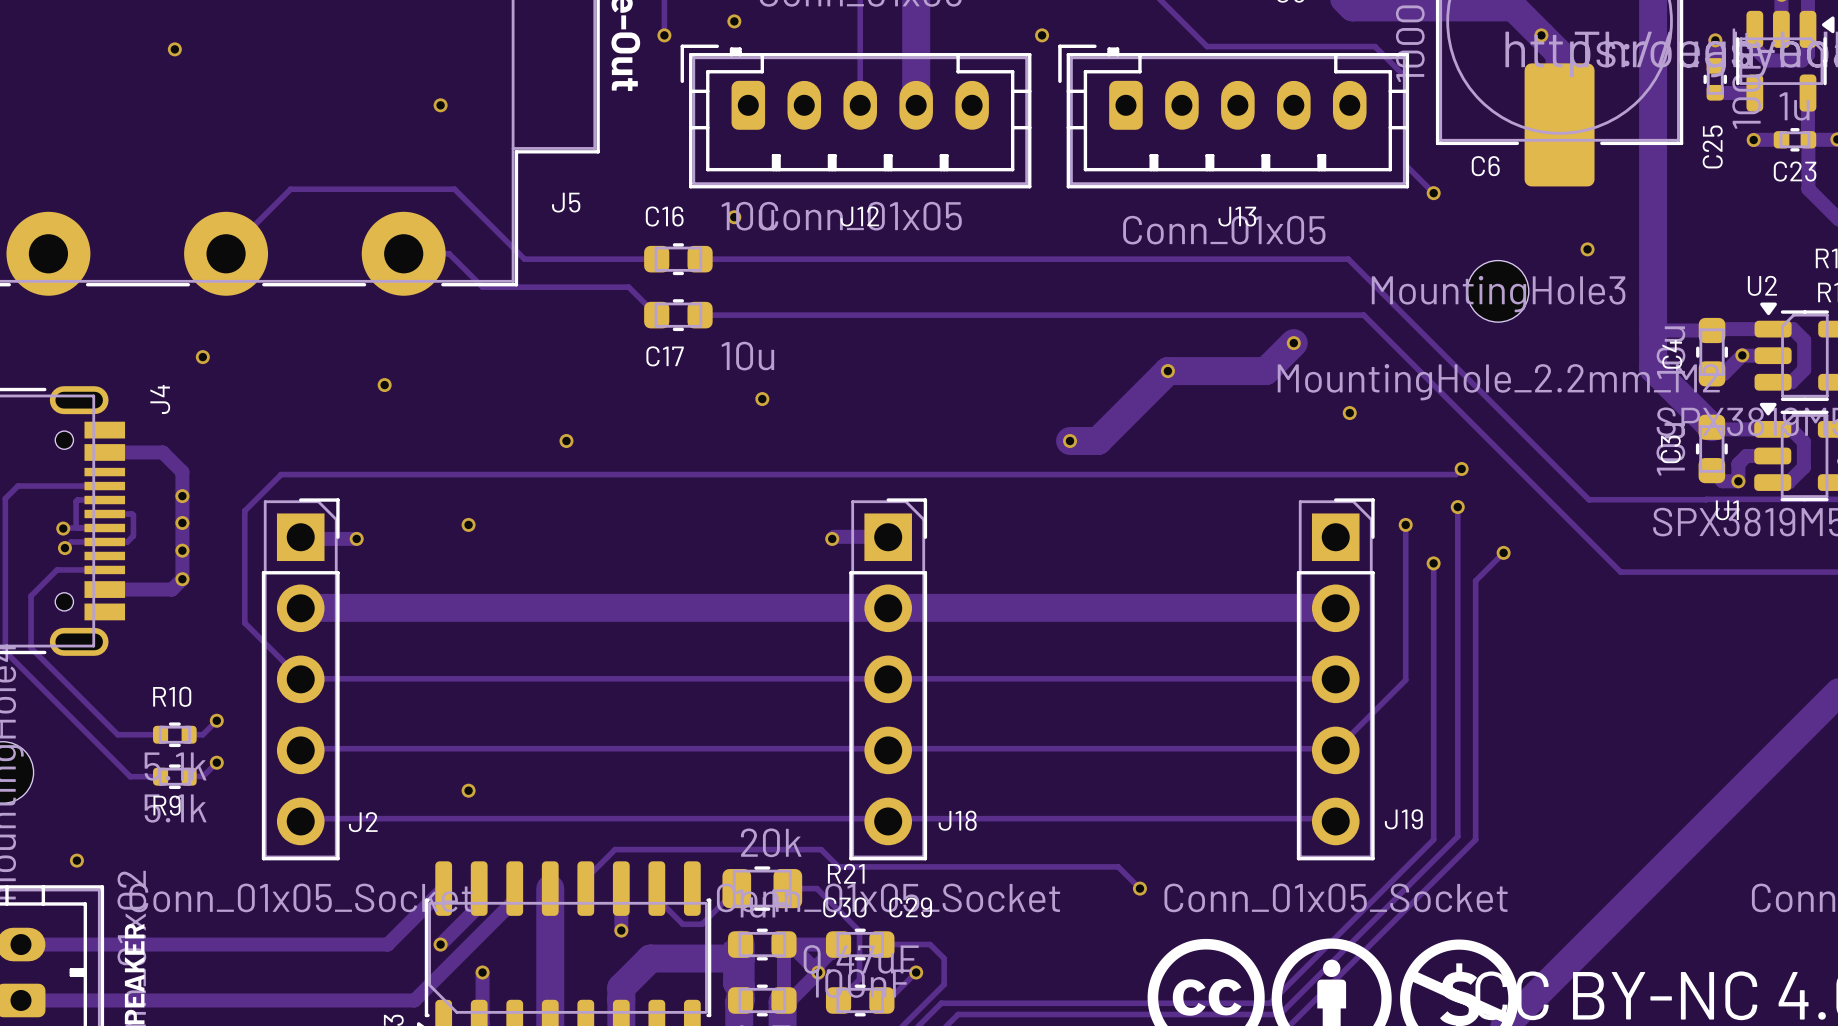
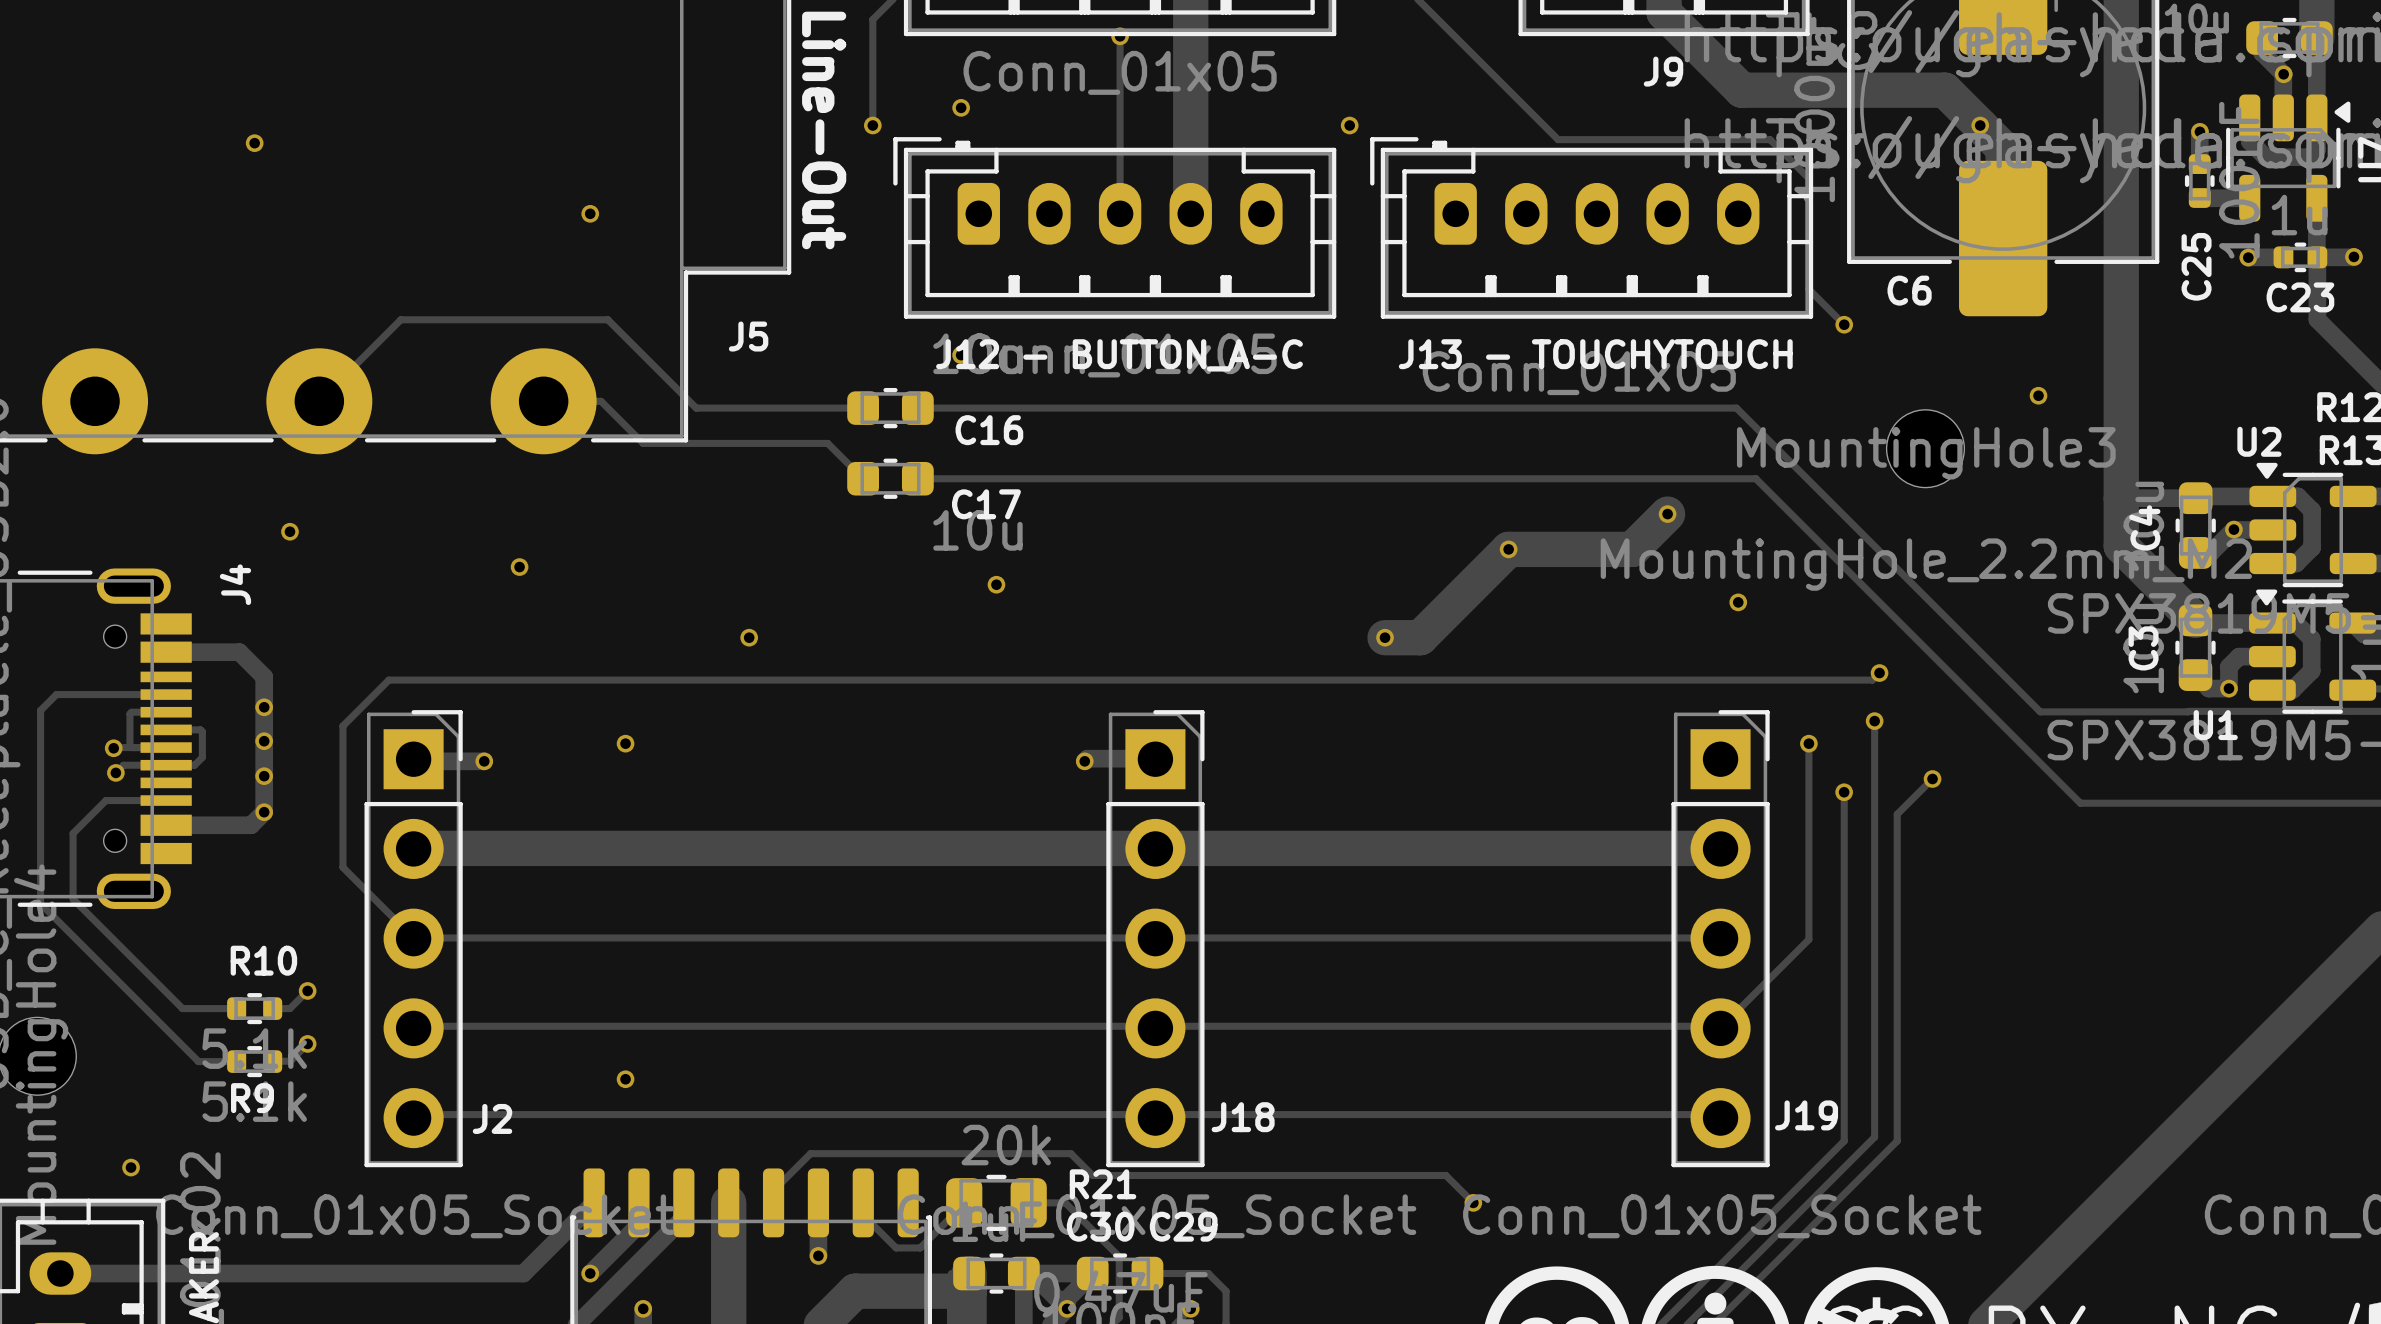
C16 name position: C16 (664, 216) -> C16 (989, 430)
J12 name: J12 (859, 216) -> J12 - BUTTON_A-C (1119, 355)
J13 name: J13 (1237, 216) -> J13 - TOUCHYTOUCH (1595, 354)
C17 name position: C17 (665, 356) -> C17 (986, 504)

